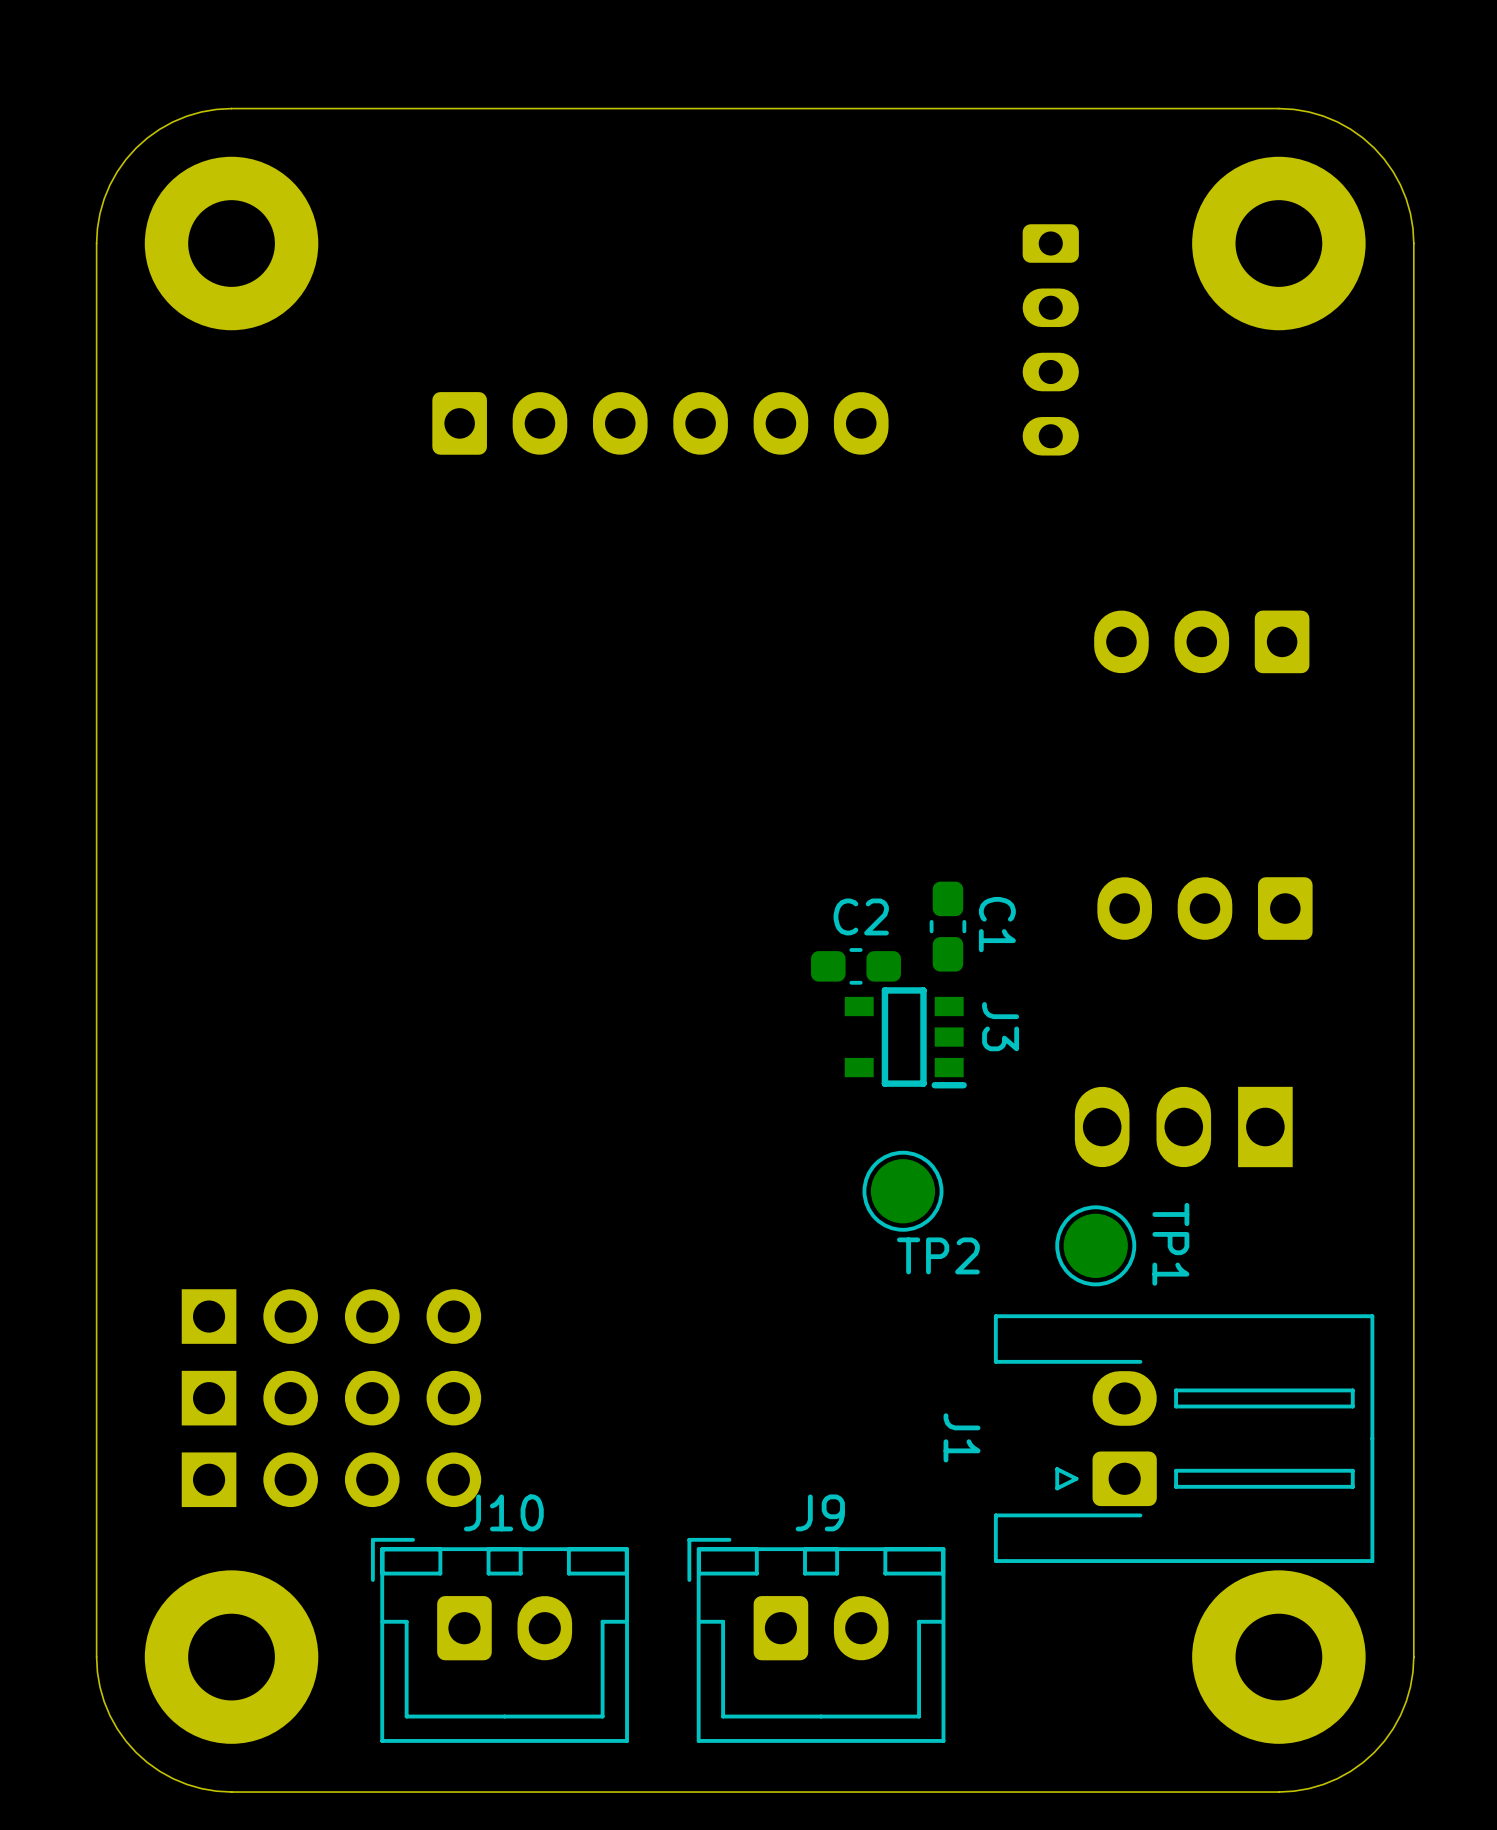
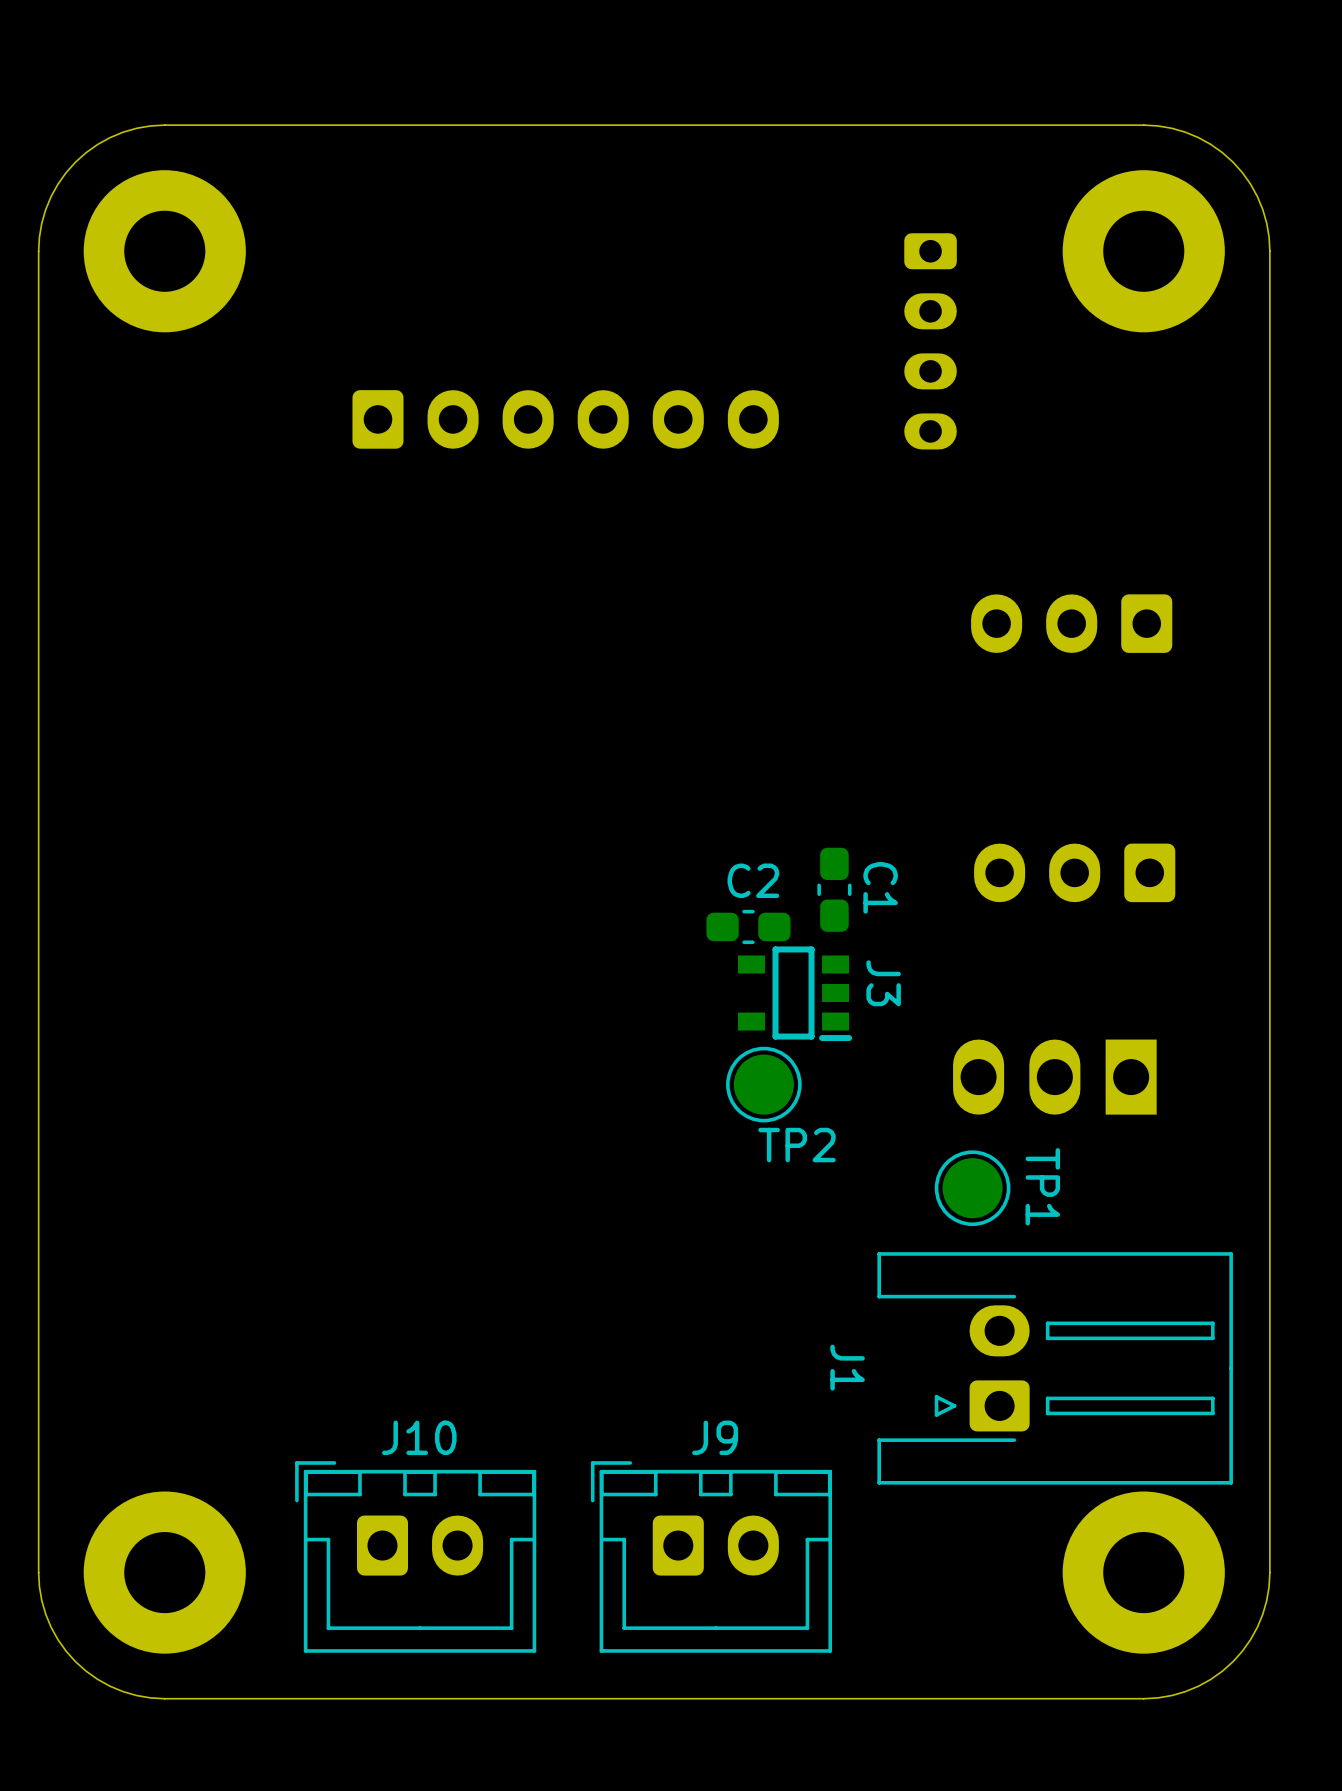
TP2 position: (903, 1191) -> (763, 1084)
part: (331, 1316) -> none
part: (331, 1398) -> none
part: (331, 1479) -> none

